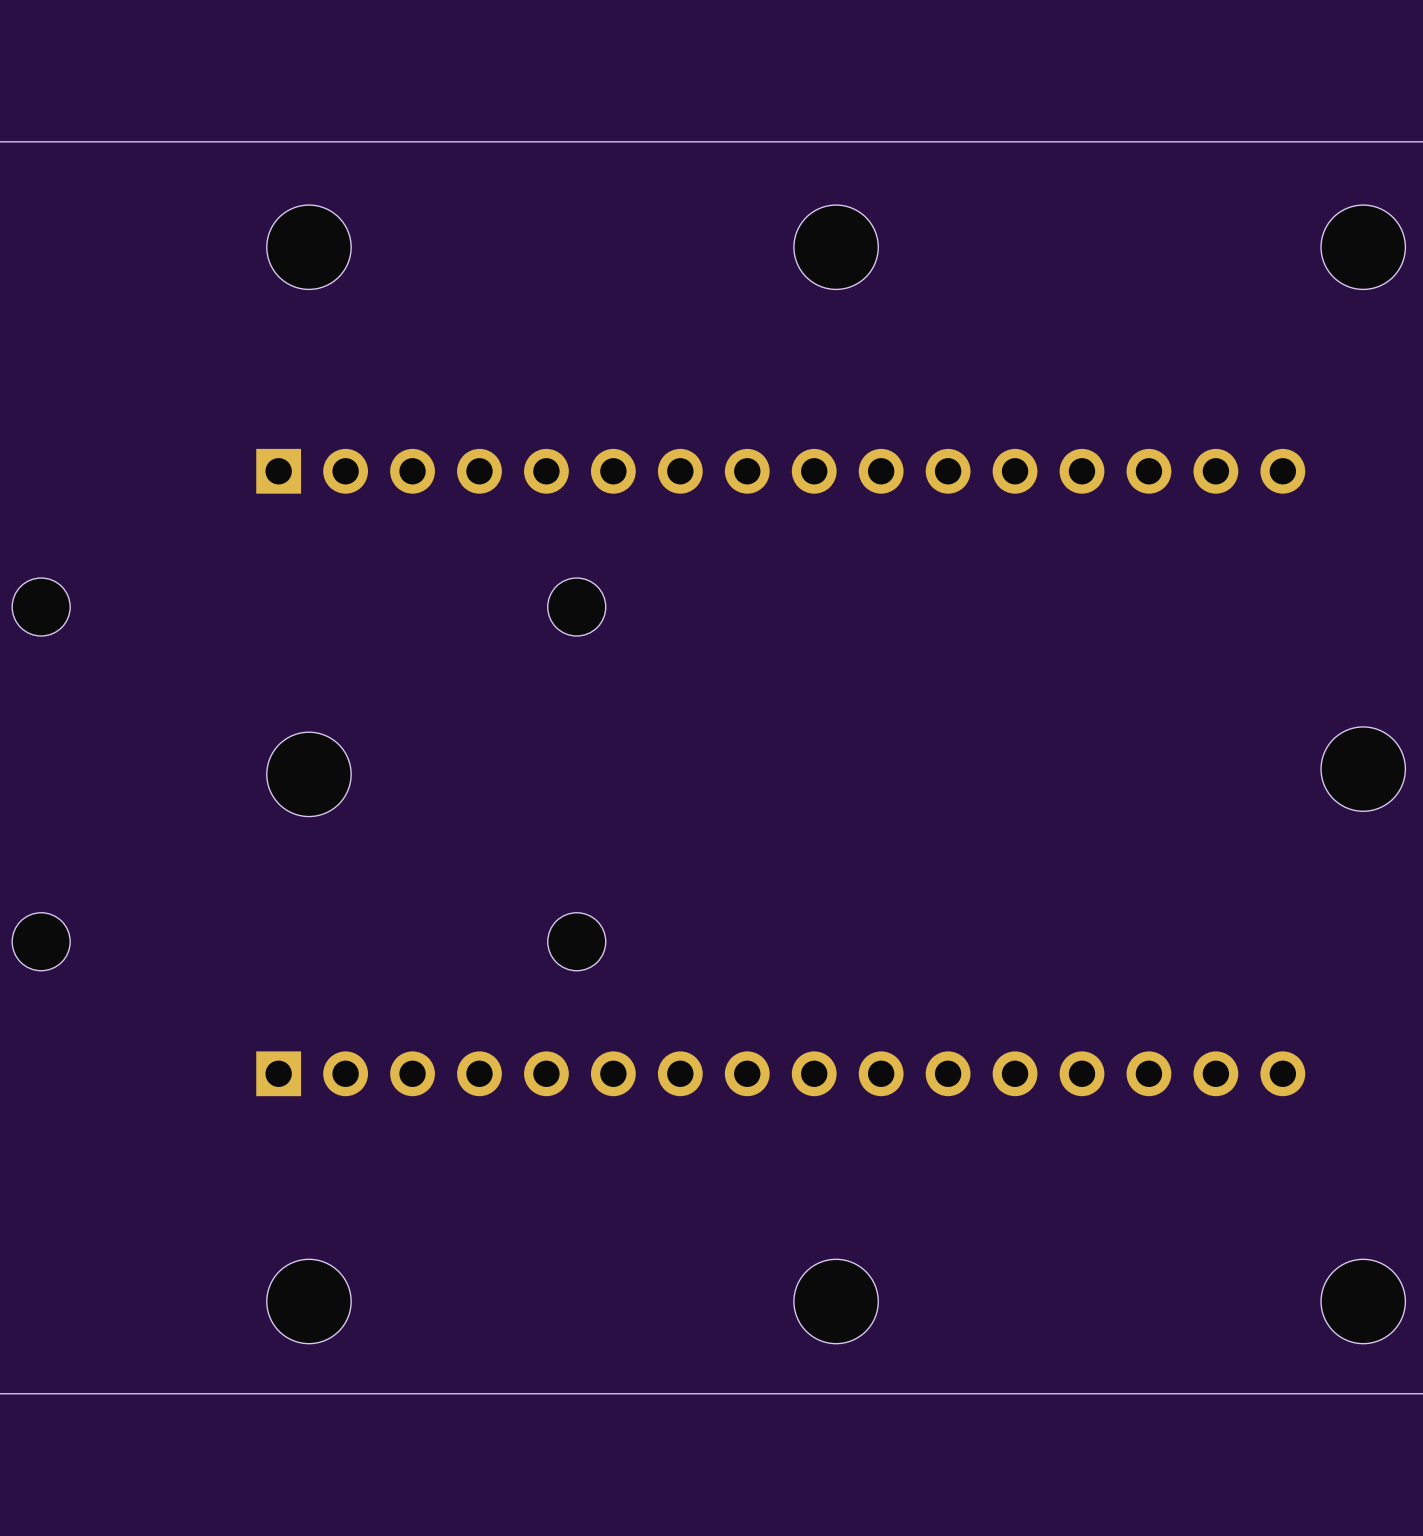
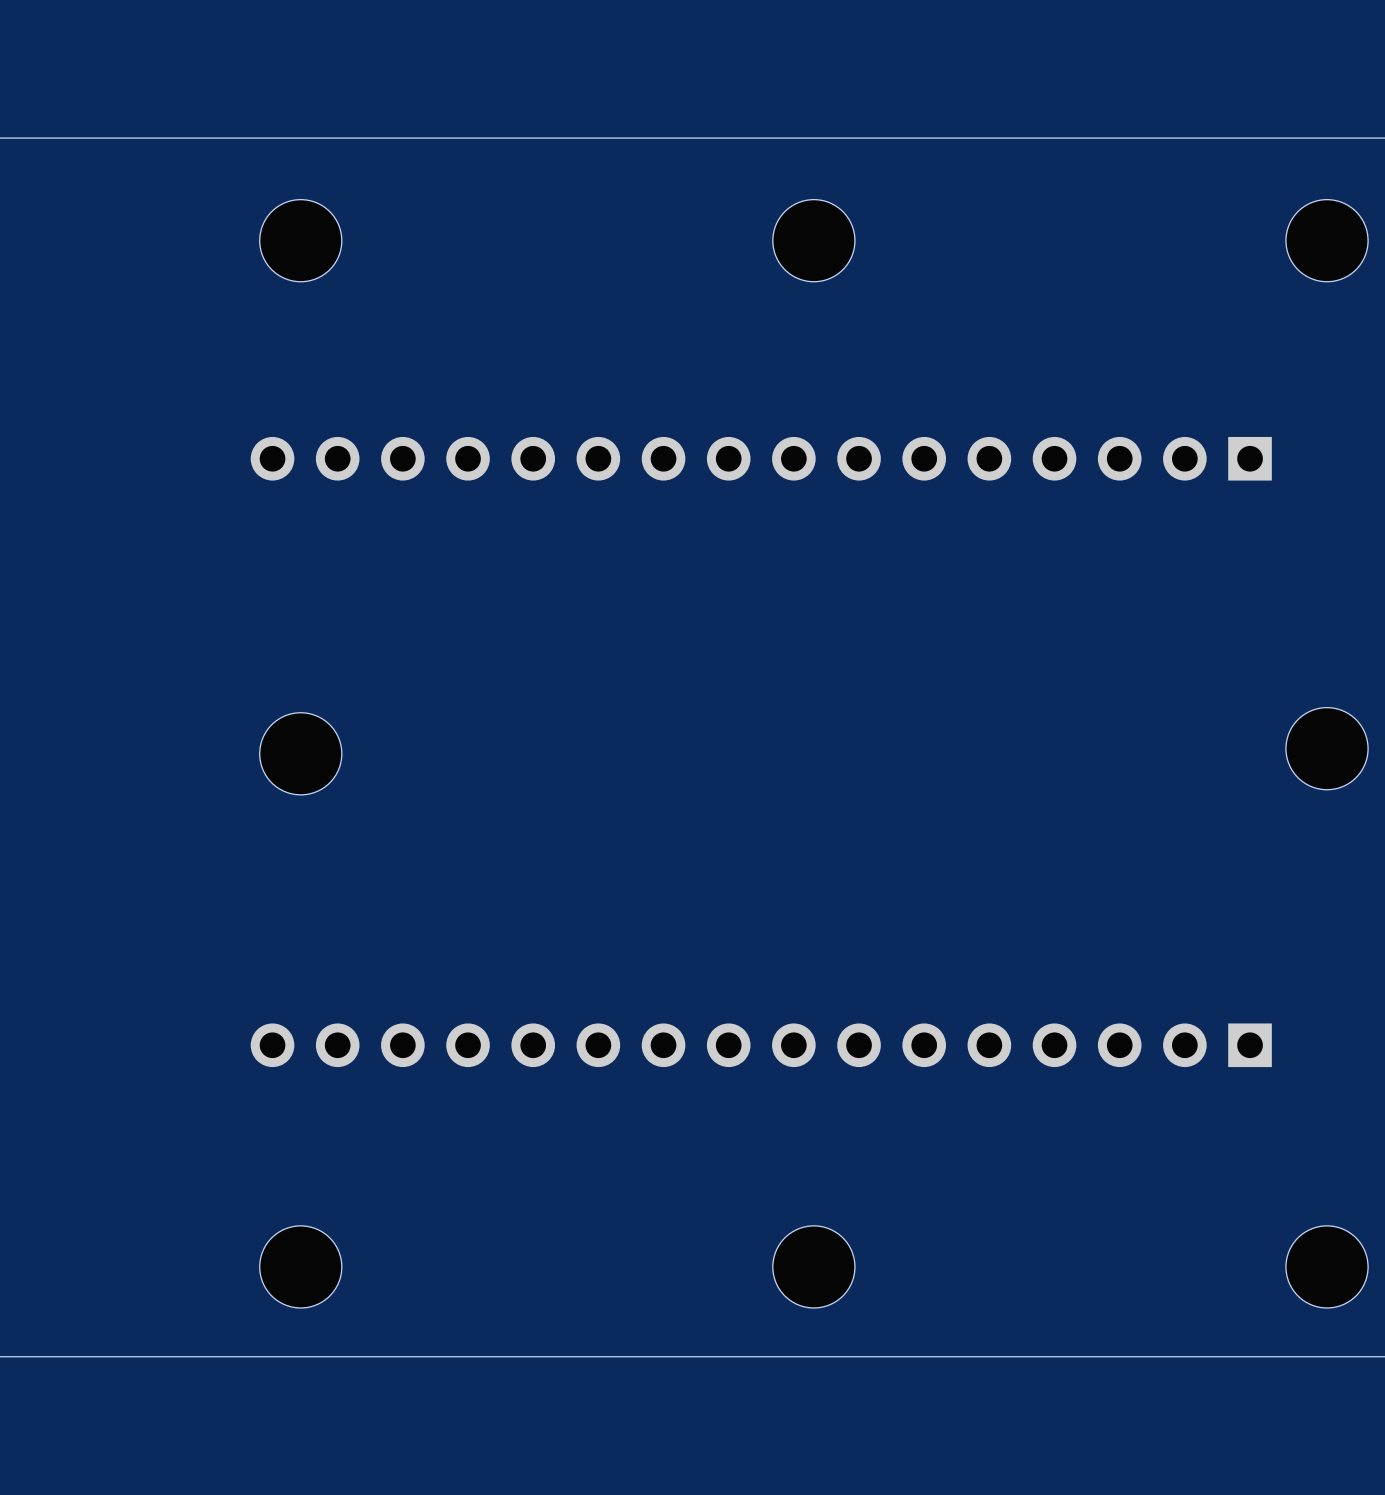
part rotation: 0° (780, 471) -> 180° (761, 458)
part: (41, 607) -> none
part: (576, 607) -> none
part: (41, 941) -> none
part: (576, 941) -> none
part rotation: 0° (780, 1073) -> 180° (761, 1045)

